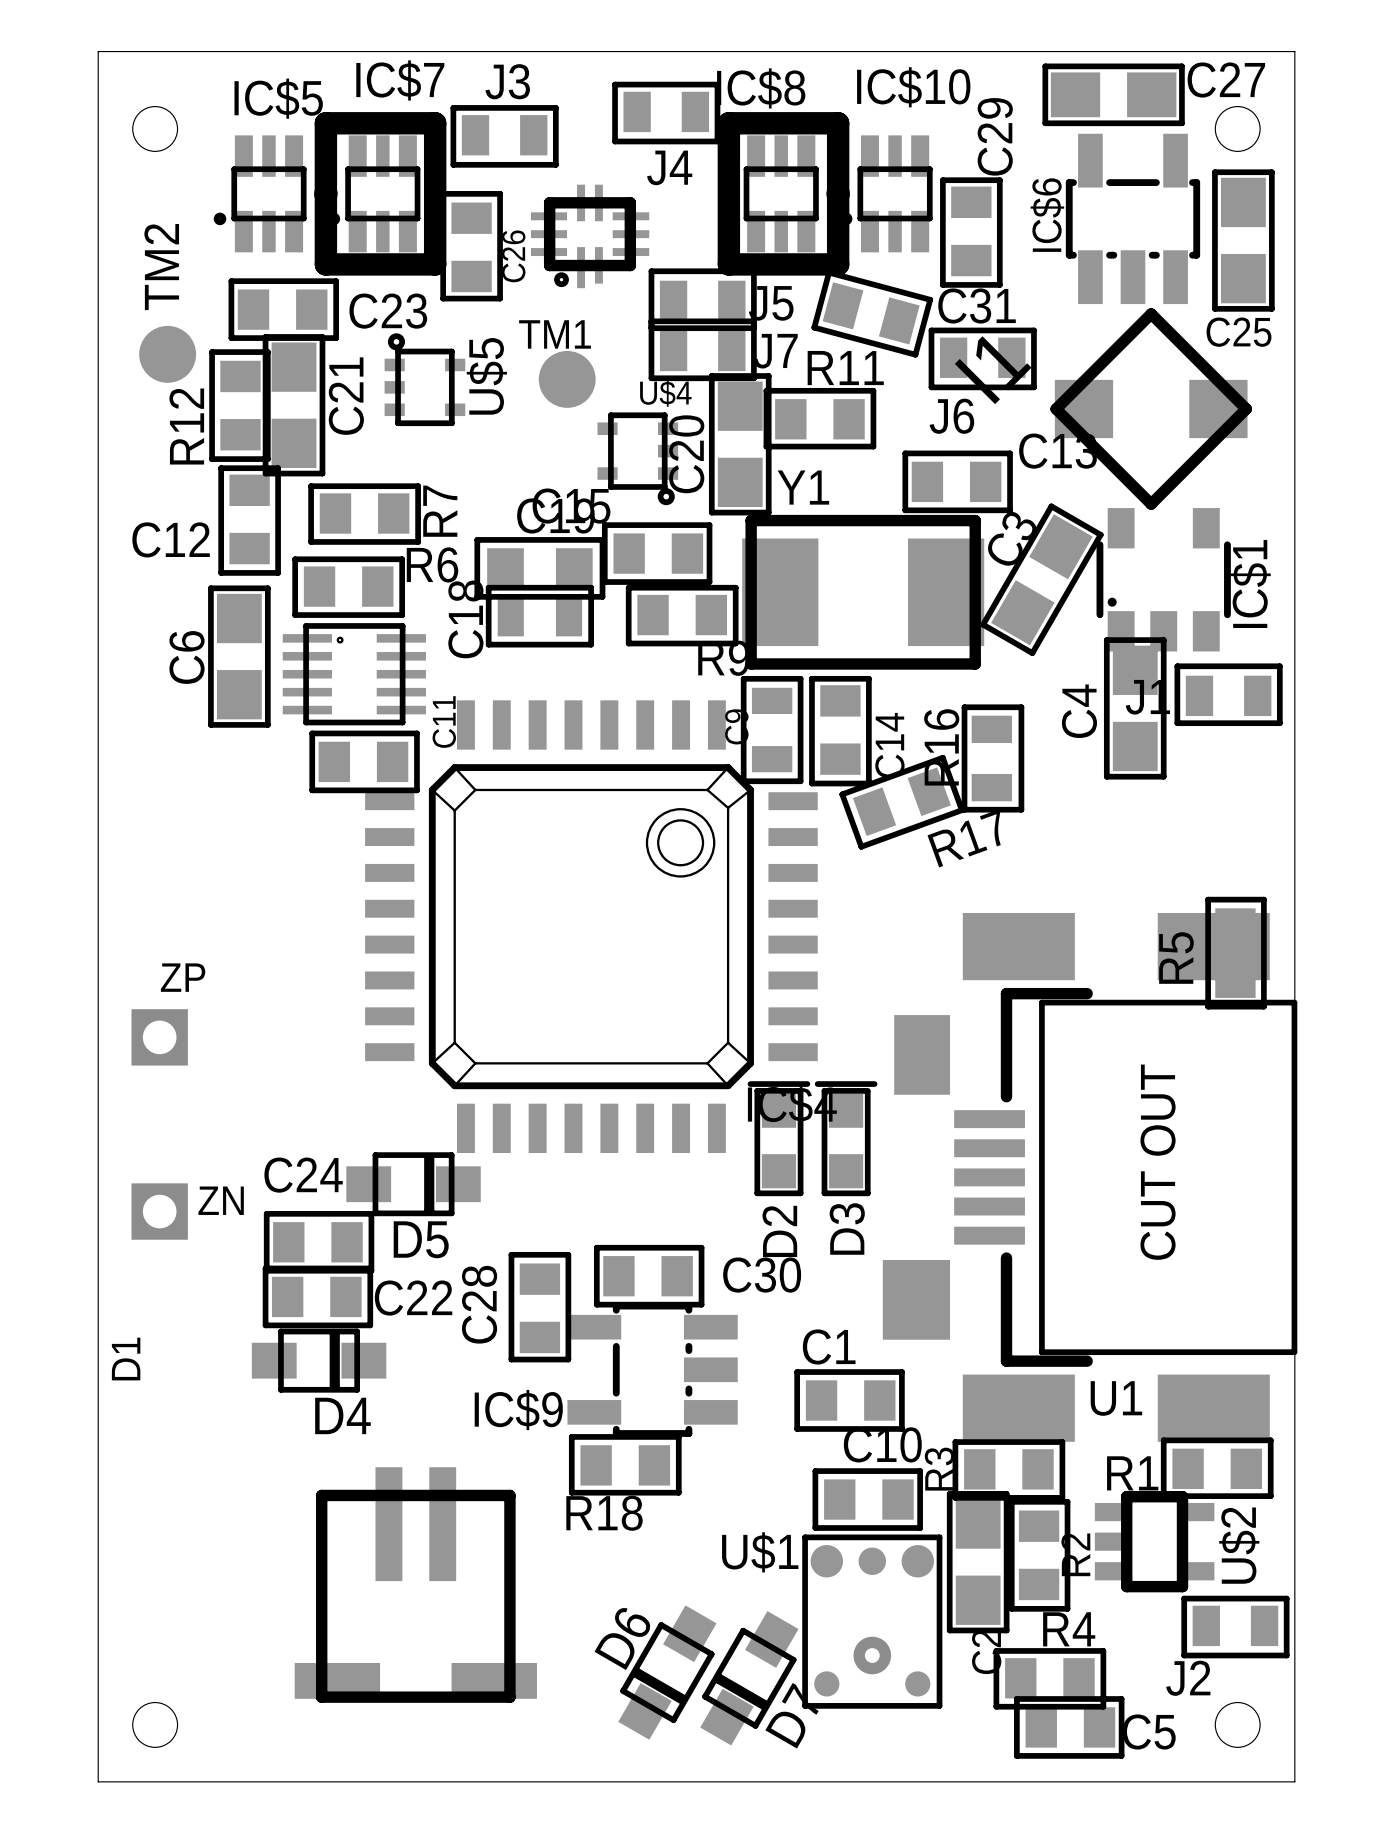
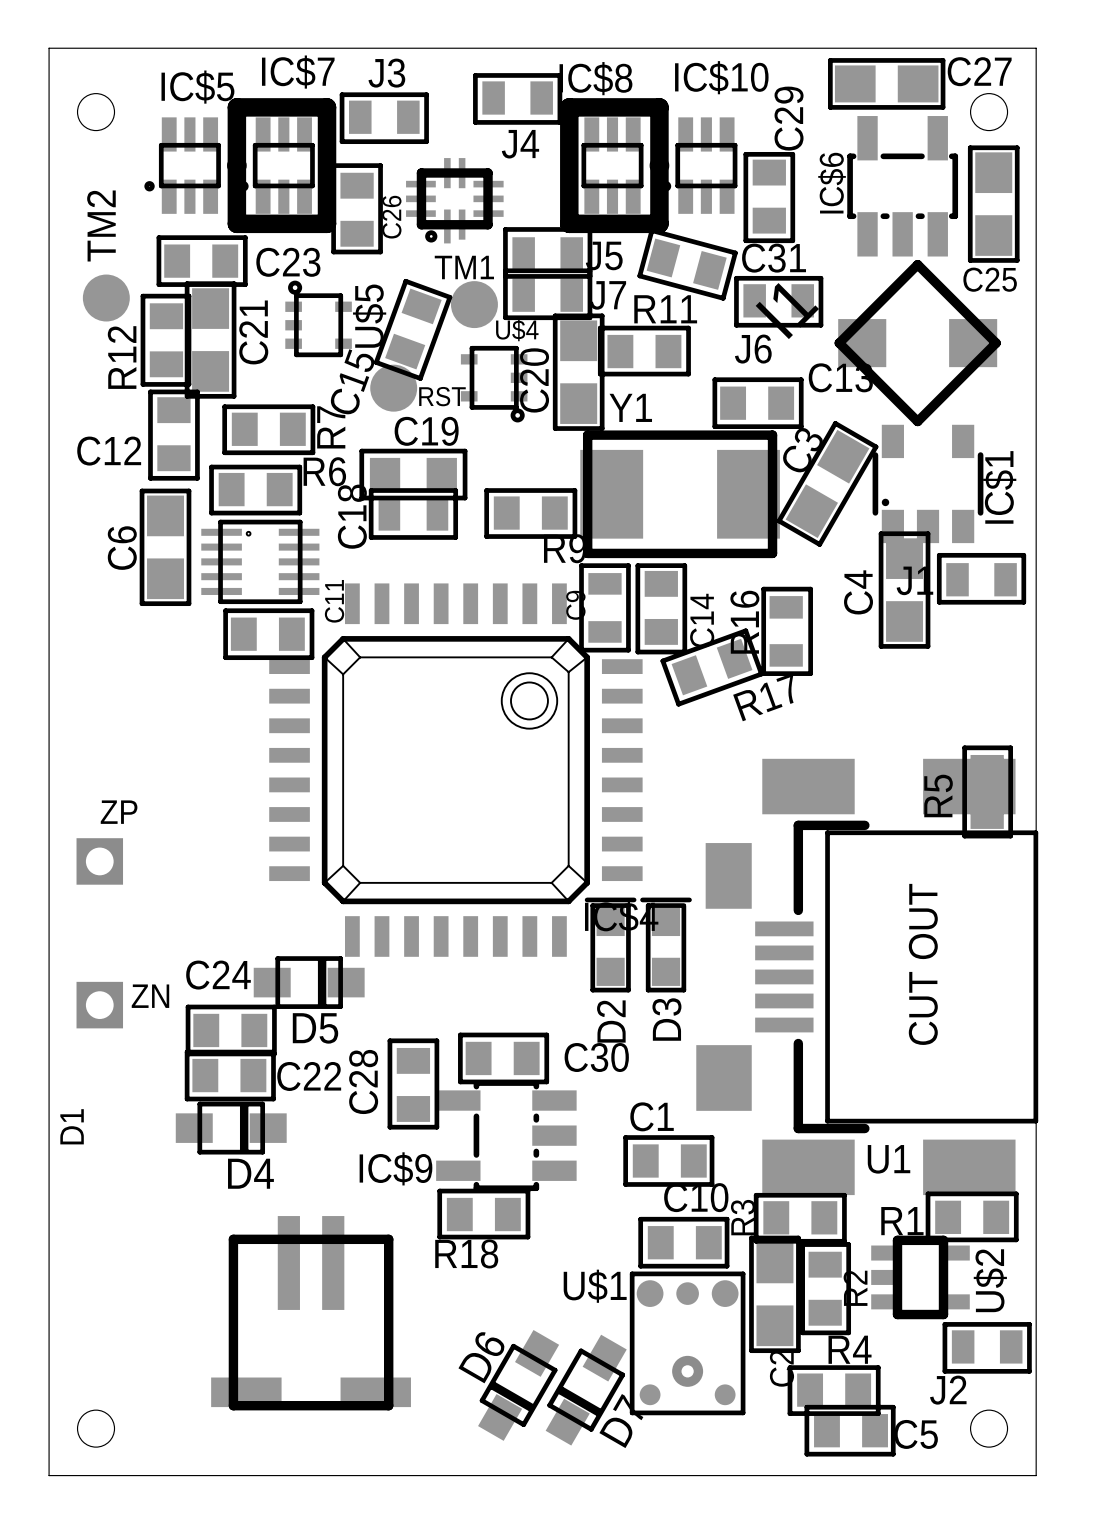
TM1 position: (567, 379) -> (474, 304)
RST: none -> (393, 388)
C15 rotation: 0° (657, 553) -> 70° counterclockwise (413, 329)
C15 position: (657, 553) -> (413, 329)

